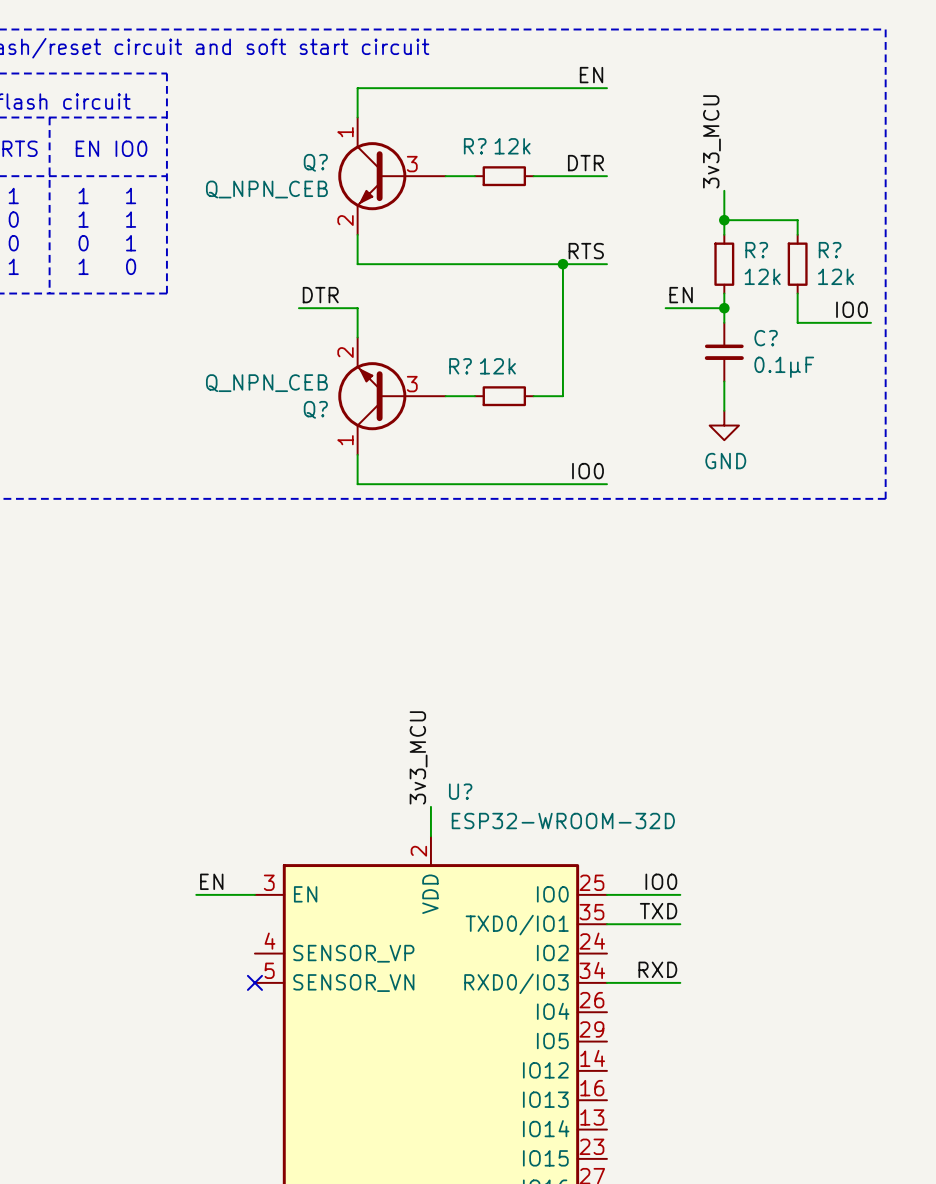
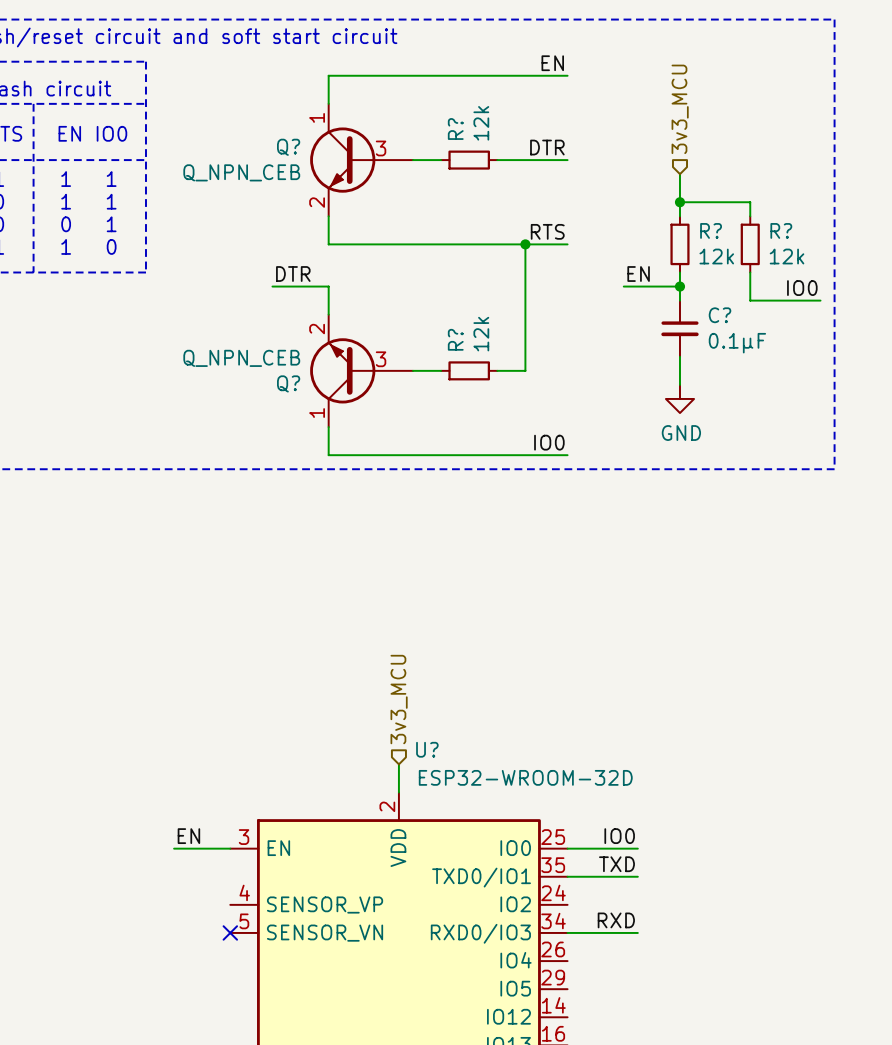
hierarchical label: none -> 3v3_MCU (680, 109)
label: 3v3_MCU (711, 141) -> none
R? name rotation: 0° (475, 146) -> 90° counterclockwise (455, 129)
R? value rotation: 0° (512, 146) -> 90° counterclockwise (481, 123)
R? name rotation: 0° (460, 366) -> 90° counterclockwise (455, 339)
R? value rotation: 0° (497, 366) -> 90° counterclockwise (481, 334)
hierarchical label: none -> 3v3_MCU (399, 699)
label: 3v3_MCU (418, 757) -> none

